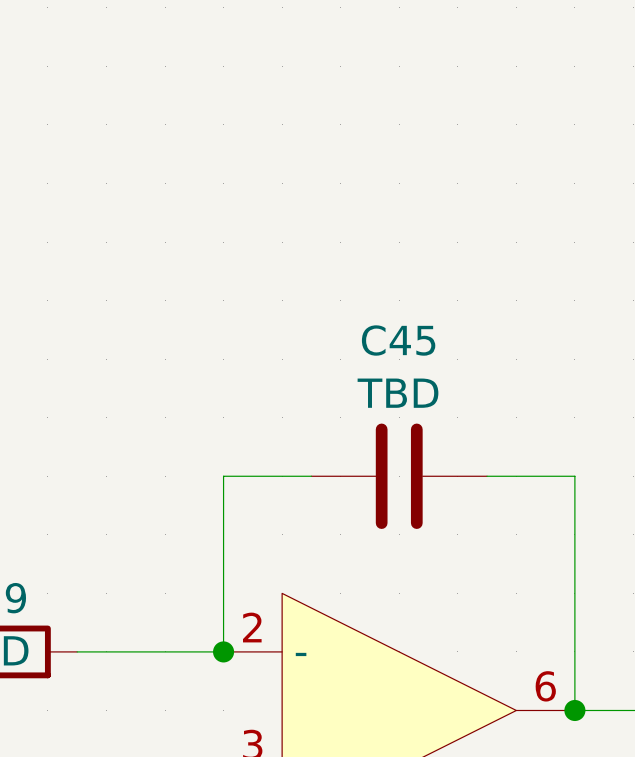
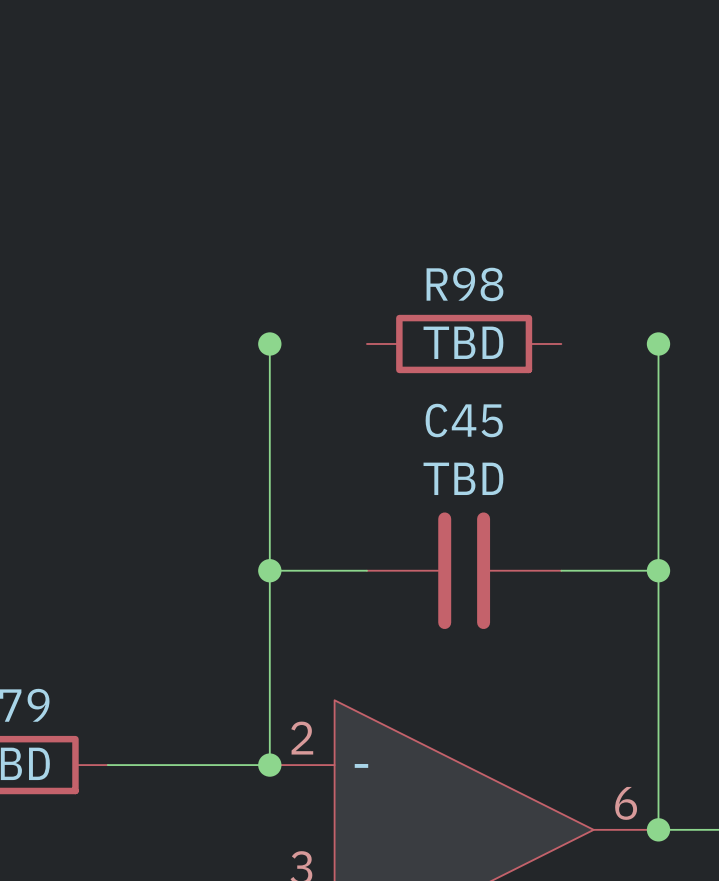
wire: none -> (269, 343) (269, 570)
junction: none -> (269, 343)
R98: none -> TBD (464, 343)
wire: none -> (658, 343) (658, 570)
junction: none -> (658, 343)
junction: none -> (269, 570)
junction: none -> (658, 570)

